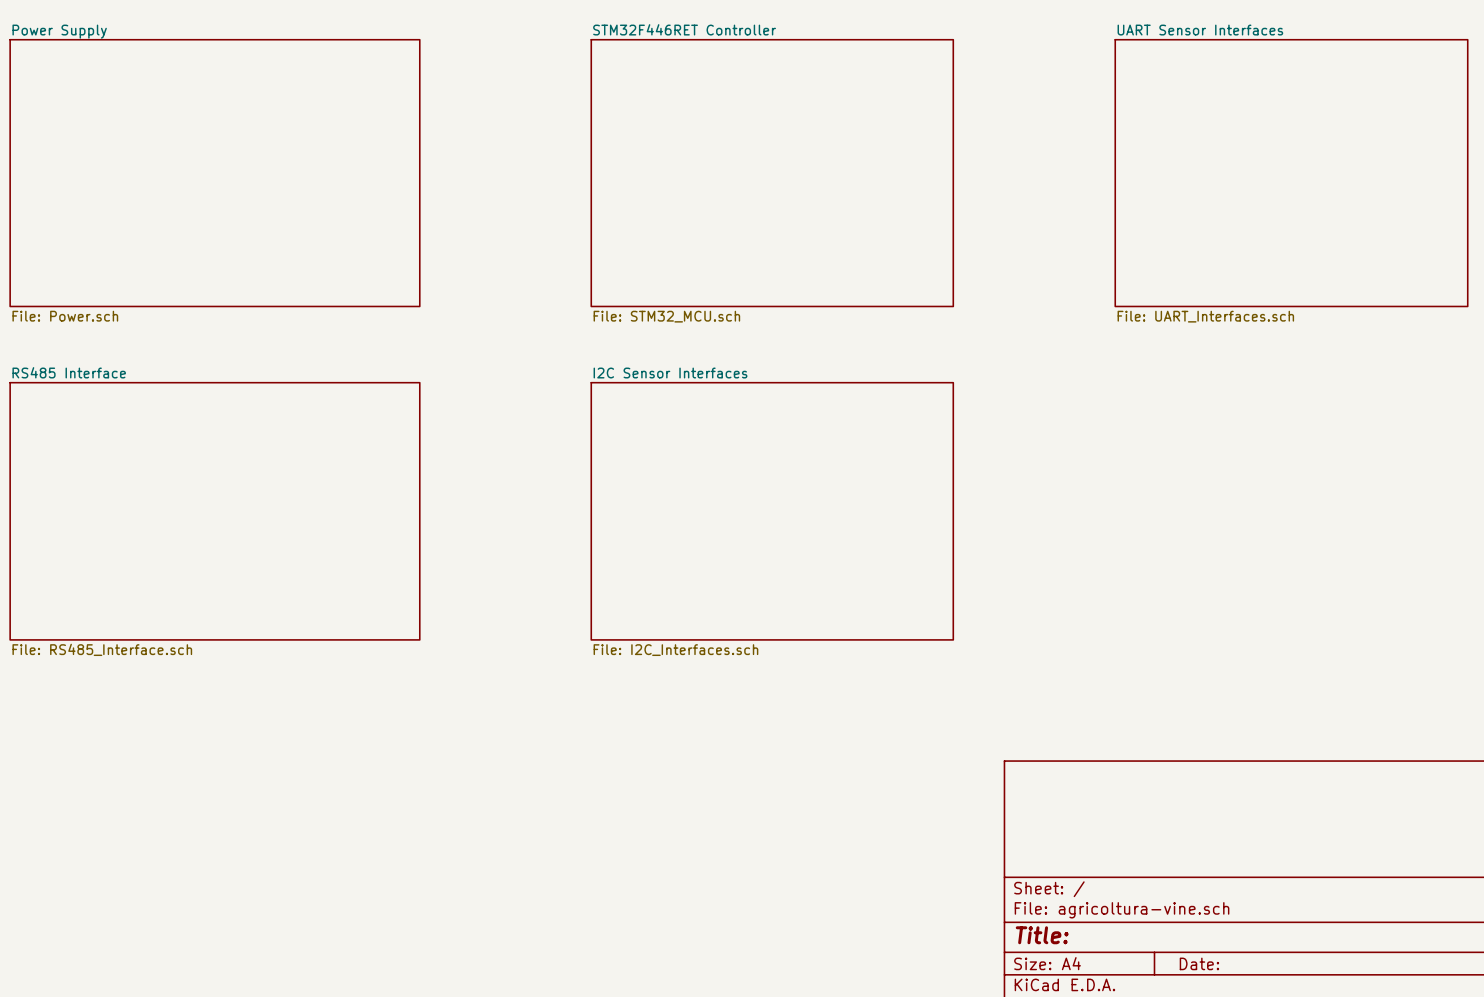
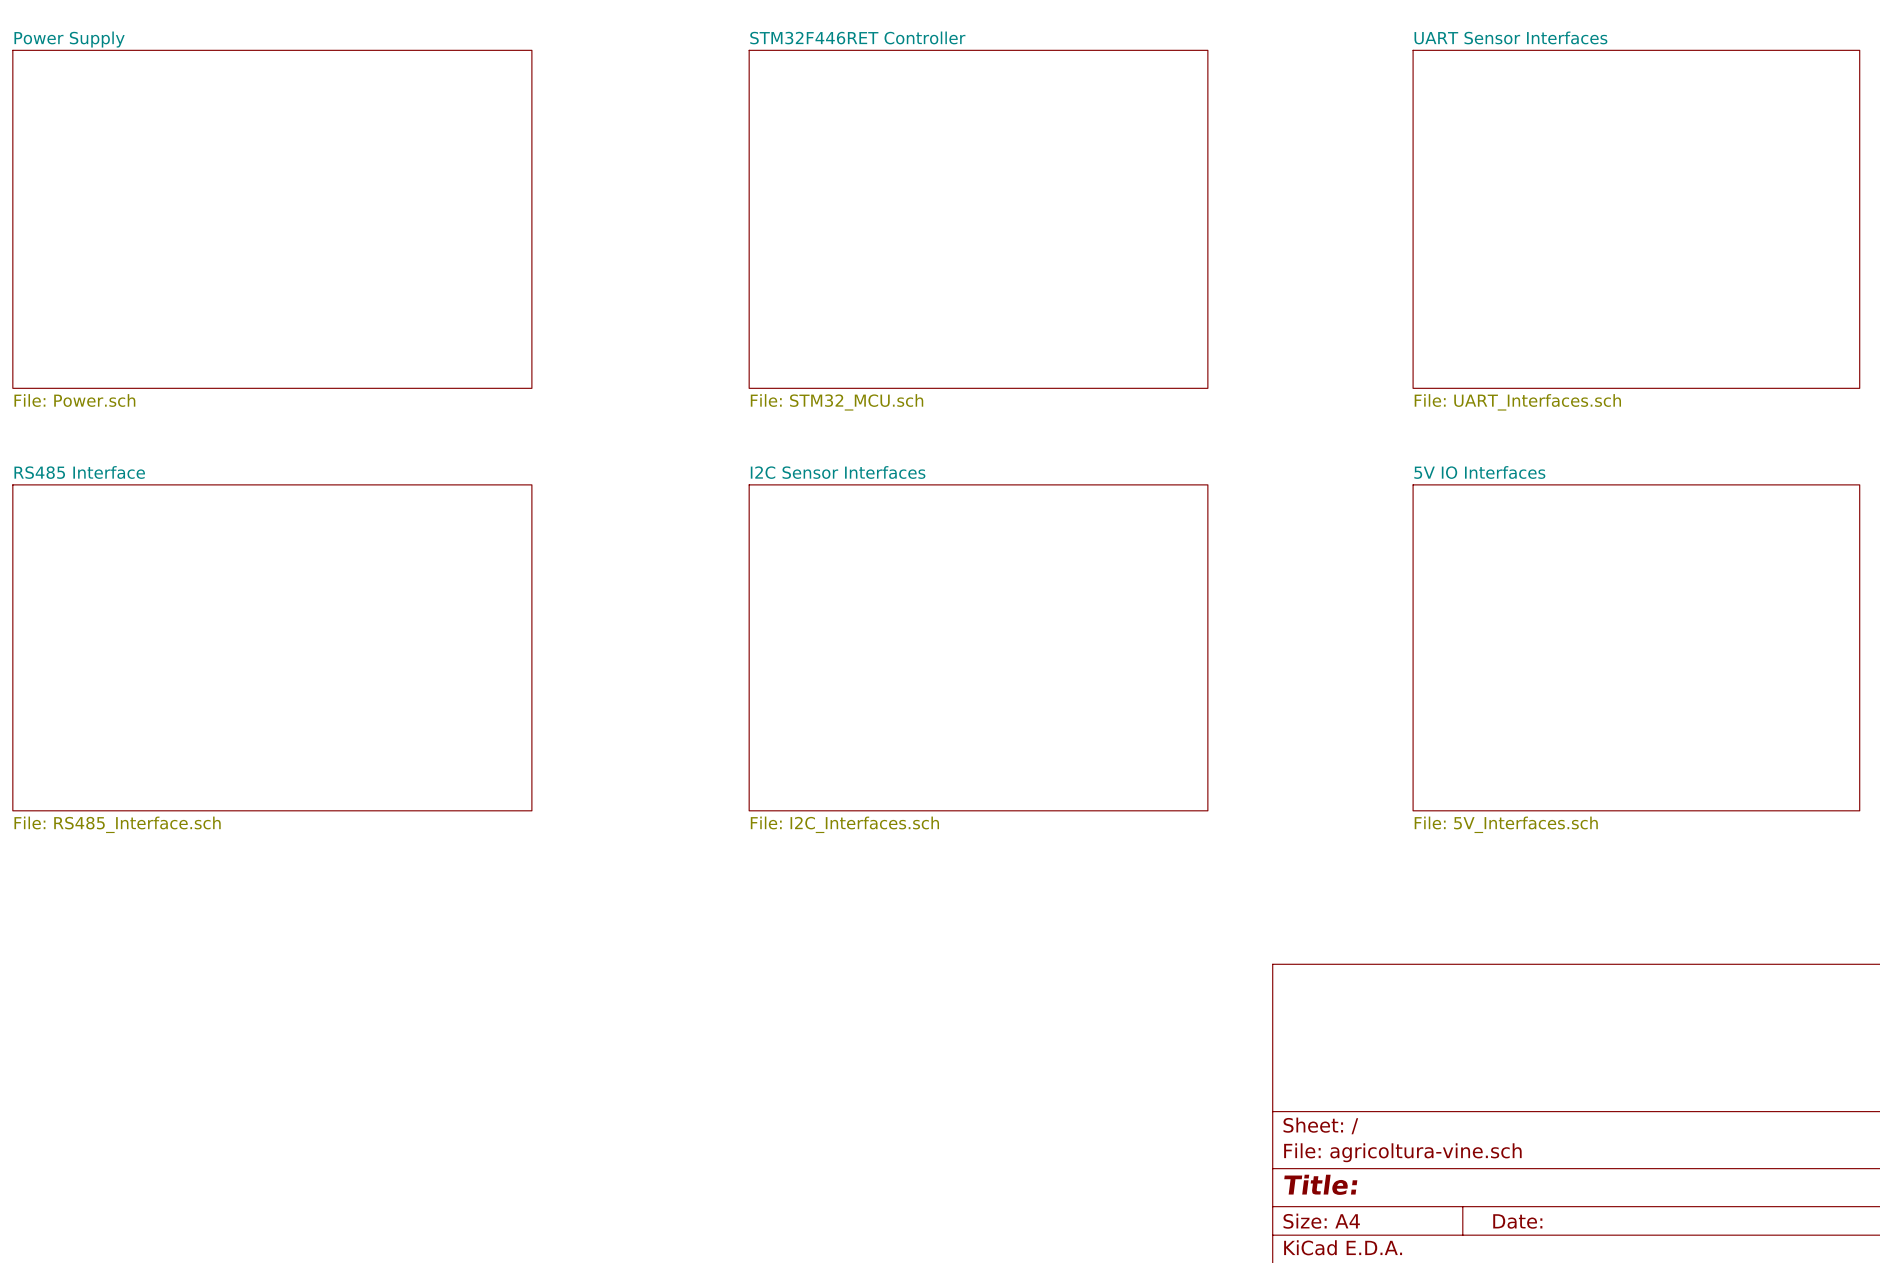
sheet 5V IO Interfaces: none -> File: 5V_Interfaces.sch (1636, 647)

